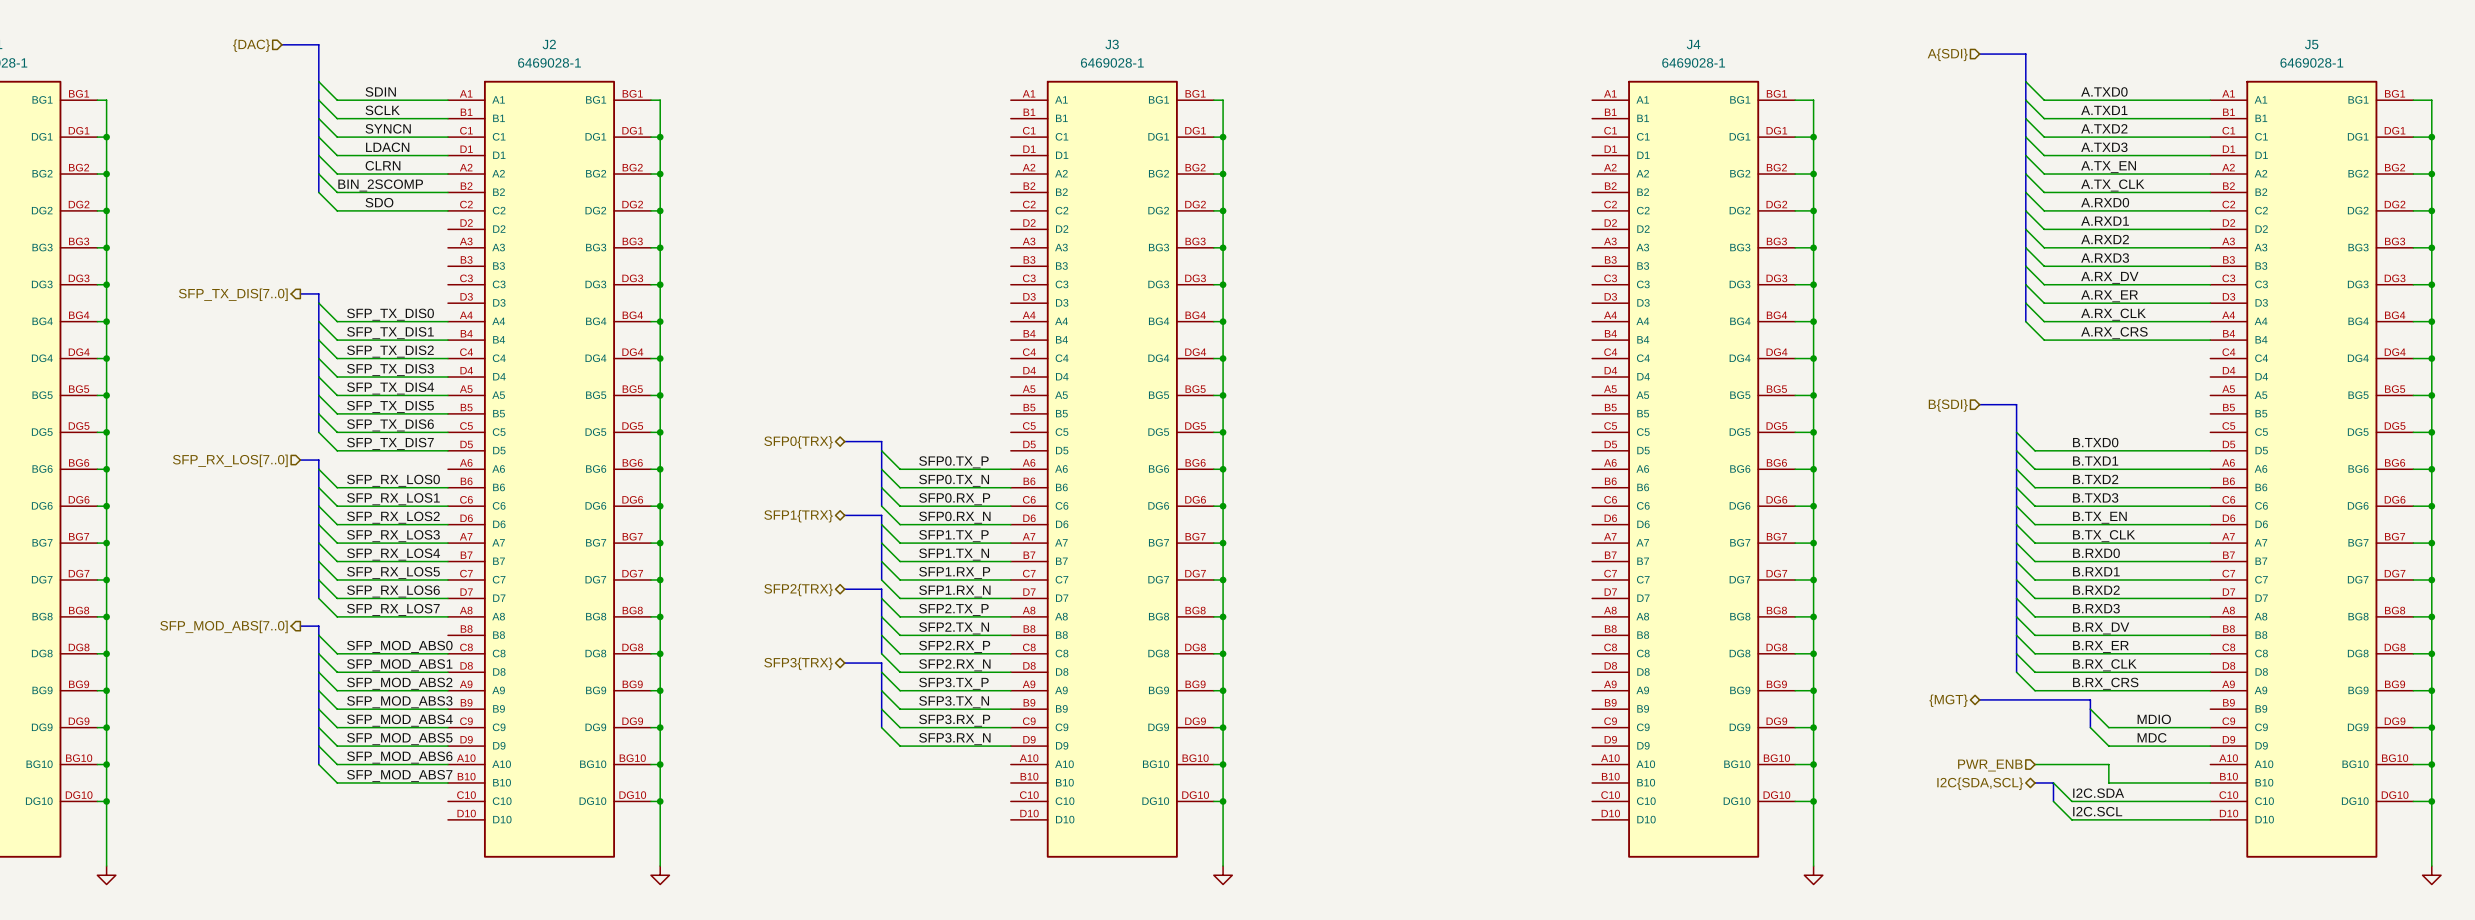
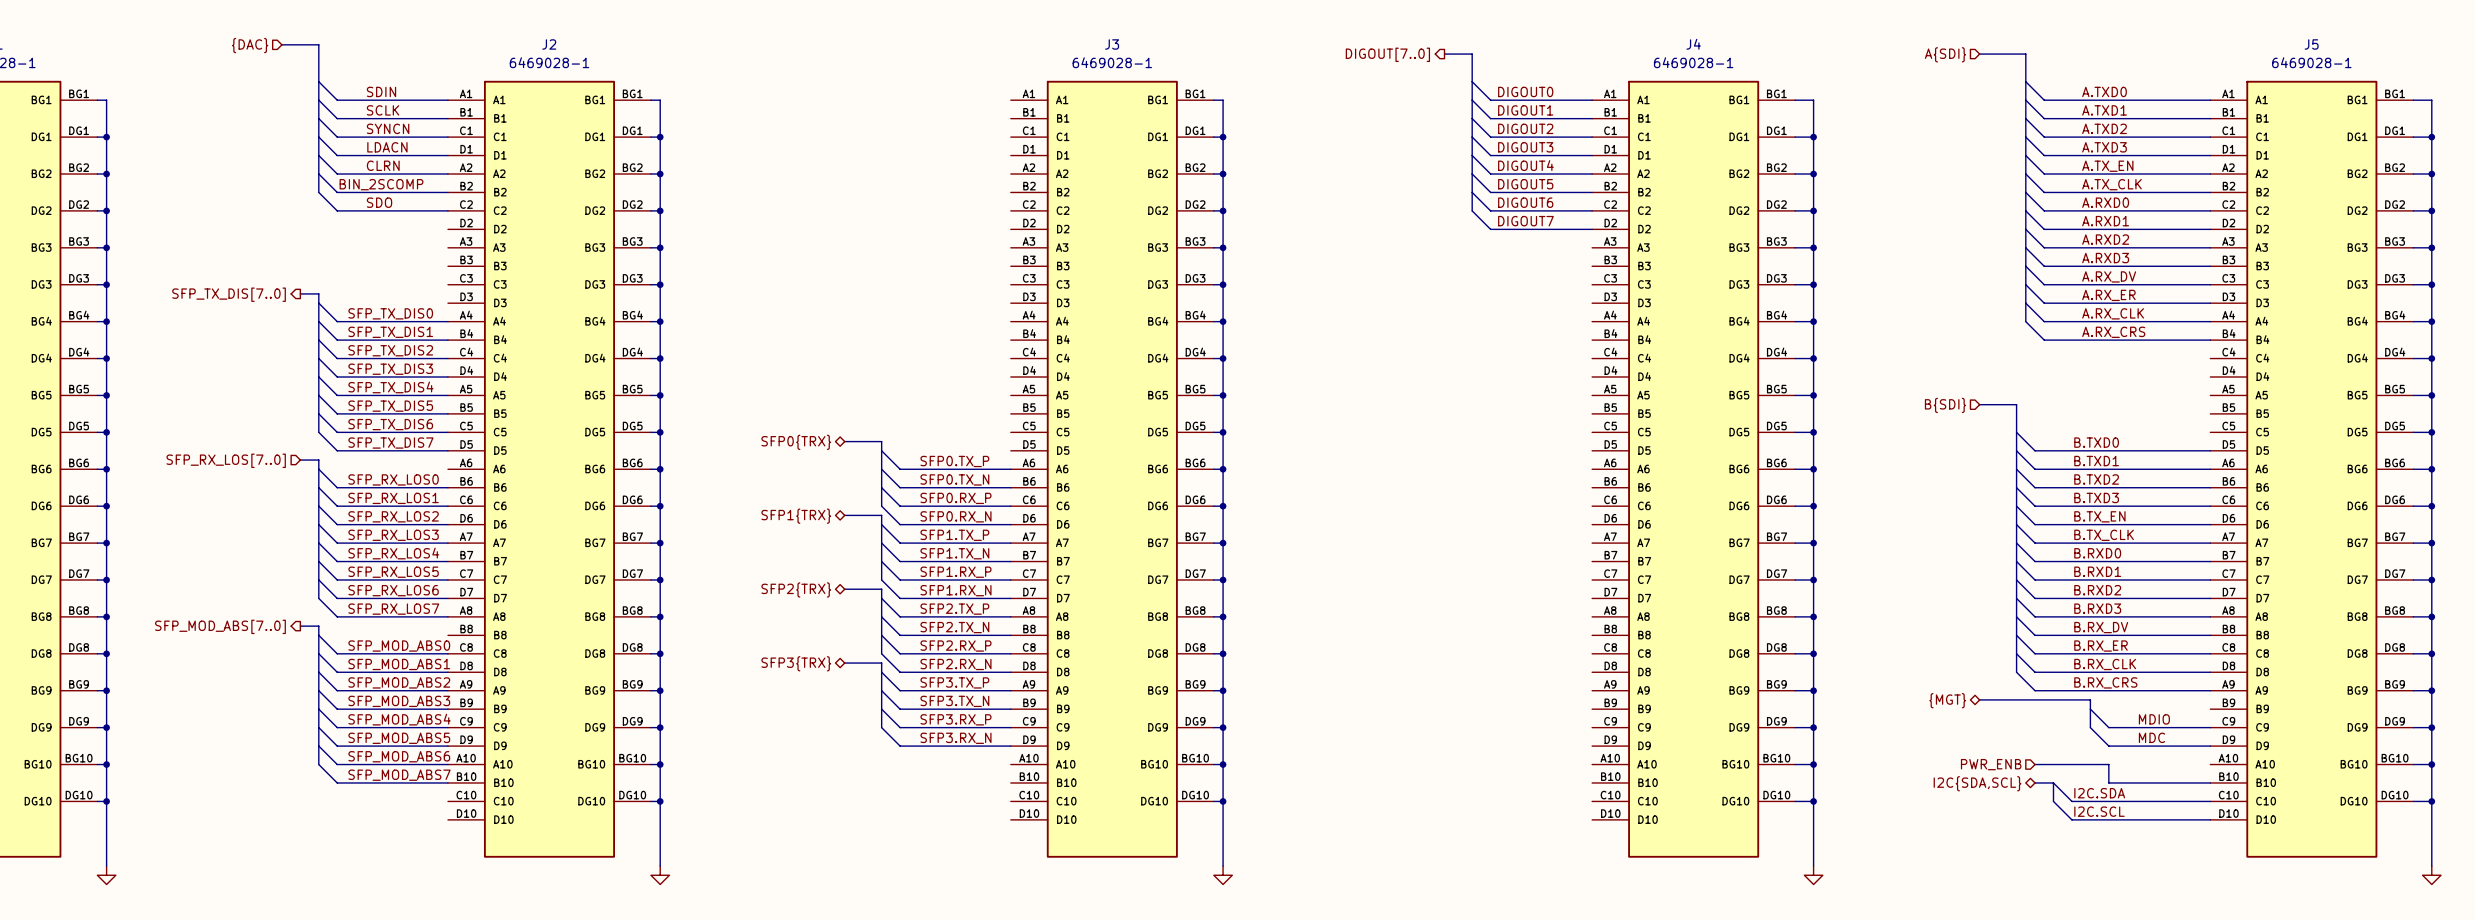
hierarchical label: none -> DIGOUT[7..0] (1387, 54)
bus: none -> (1444, 54) (1472, 54) (1472, 210)
wire: none -> (1472, 81) (1490, 100) (1592, 100)
label: none -> DIGOUT0 (1525, 91)
wire: none -> (1472, 100) (1490, 118) (1592, 118)
label: none -> DIGOUT1 (1525, 110)
wire: none -> (1472, 118) (1490, 137) (1592, 137)
label: none -> DIGOUT2 (1525, 128)
wire: none -> (1472, 137) (1490, 155) (1592, 155)
label: none -> DIGOUT3 (1525, 147)
wire: none -> (1472, 155) (1490, 174) (1592, 174)
label: none -> DIGOUT4 (1525, 165)
wire: none -> (1472, 174) (1490, 192) (1592, 192)
label: none -> DIGOUT5 (1525, 184)
wire: none -> (1472, 192) (1490, 210) (1592, 210)
label: none -> DIGOUT6 (1525, 202)
wire: none -> (1472, 210) (1490, 229) (1592, 229)
label: none -> DIGOUT7 (1525, 221)

